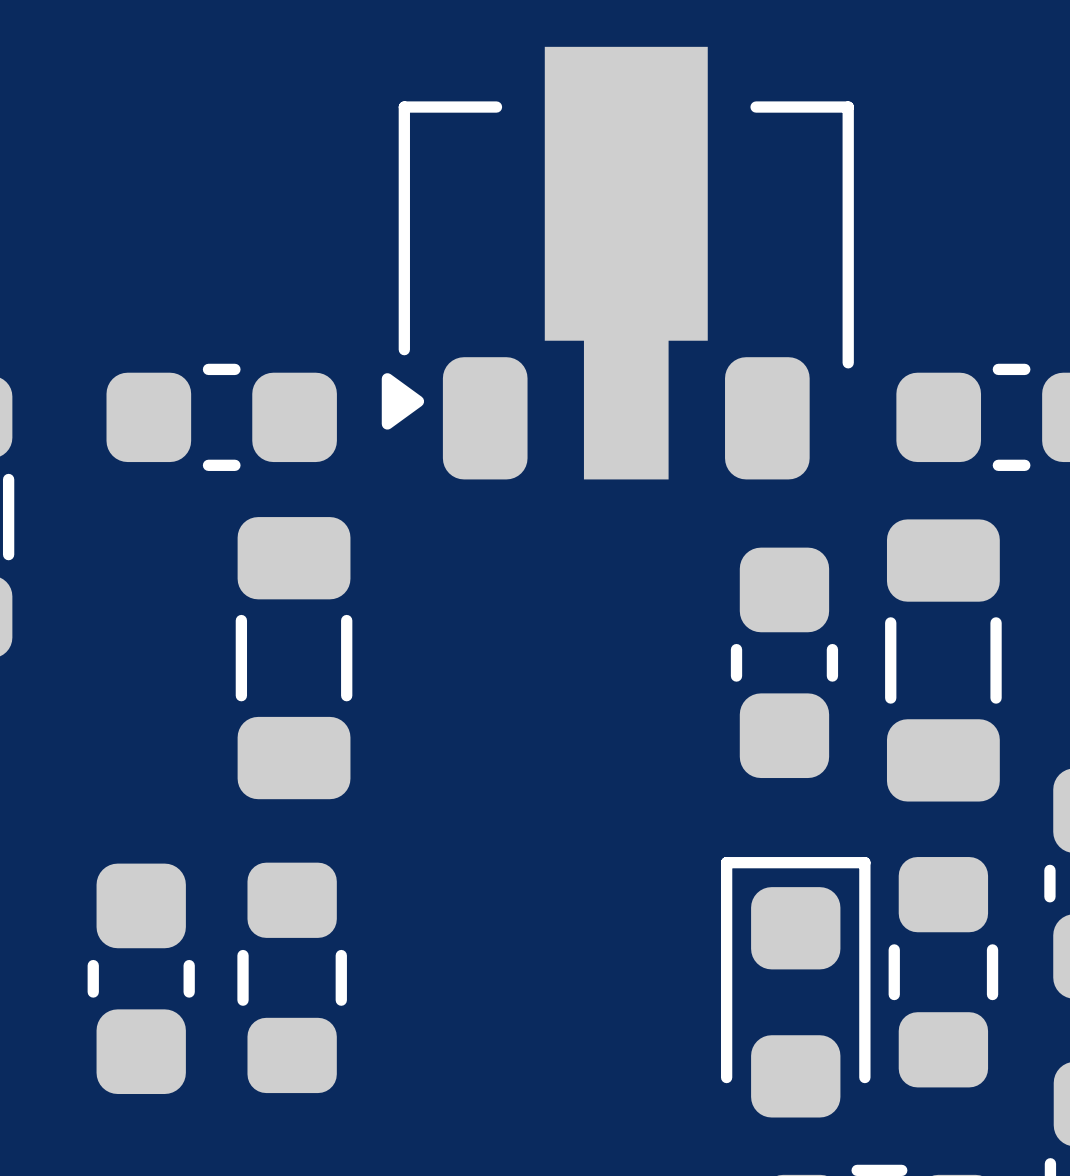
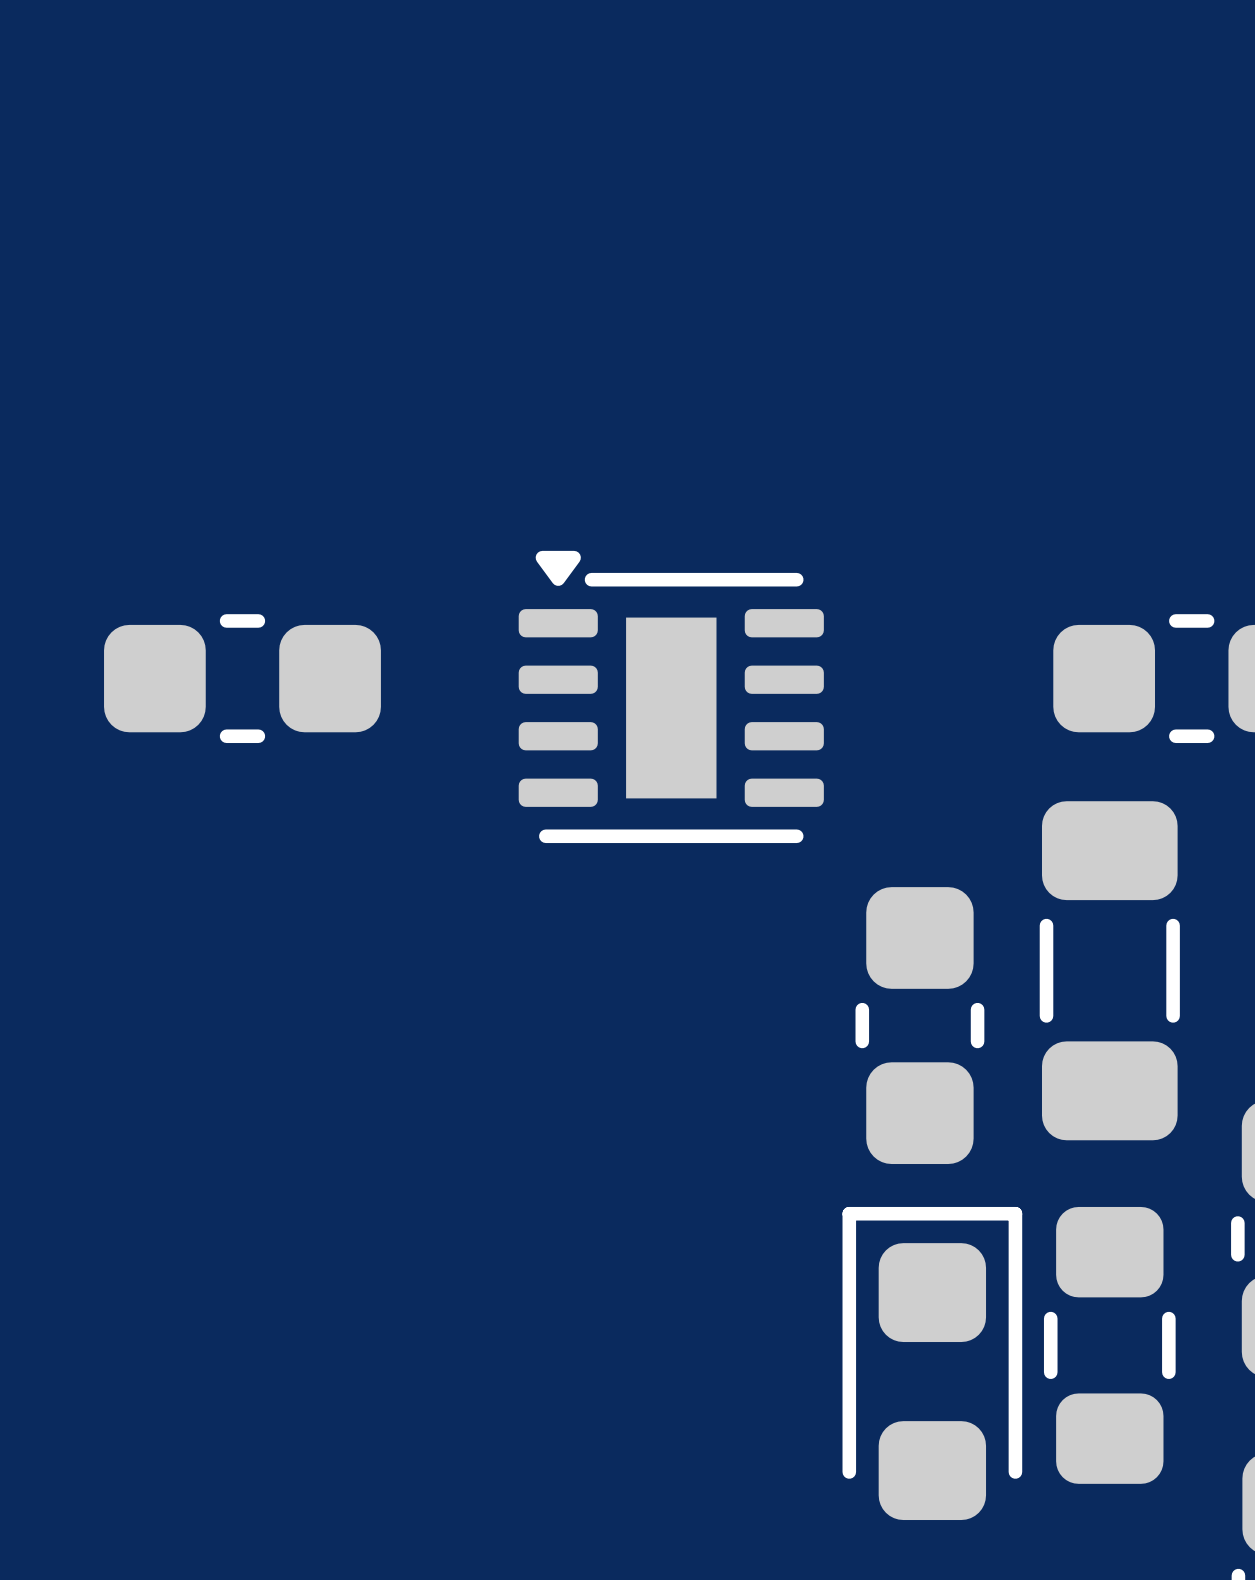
part: (617, 263) -> none
part: none -> (671, 696)
part: (294, 658) -> none
part position: (784, 662) -> (919, 1025)
part: (292, 977) -> none
part: (141, 978) -> none

